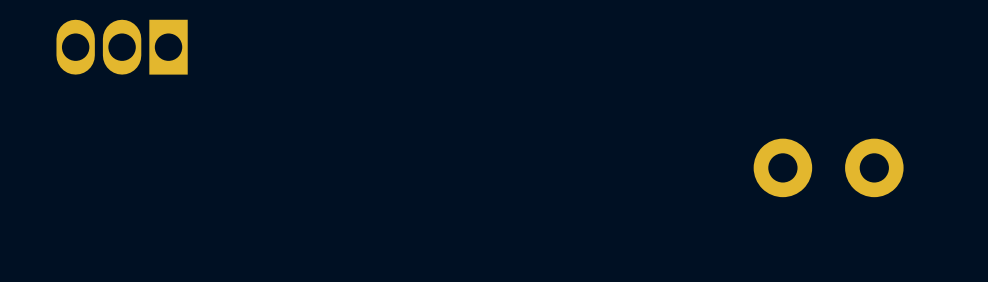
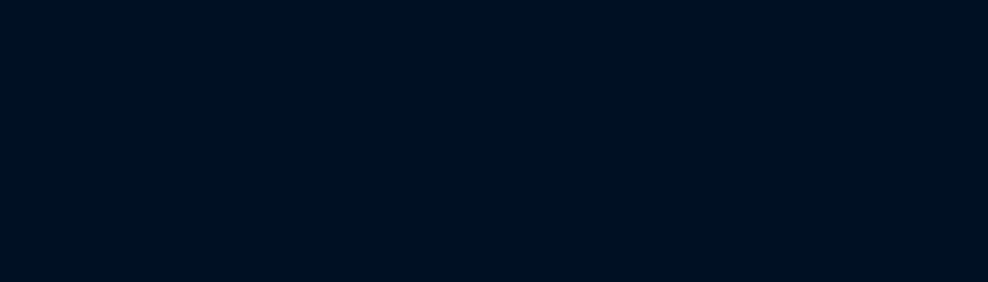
part: (122, 47) -> none
part: (828, 167) -> none

